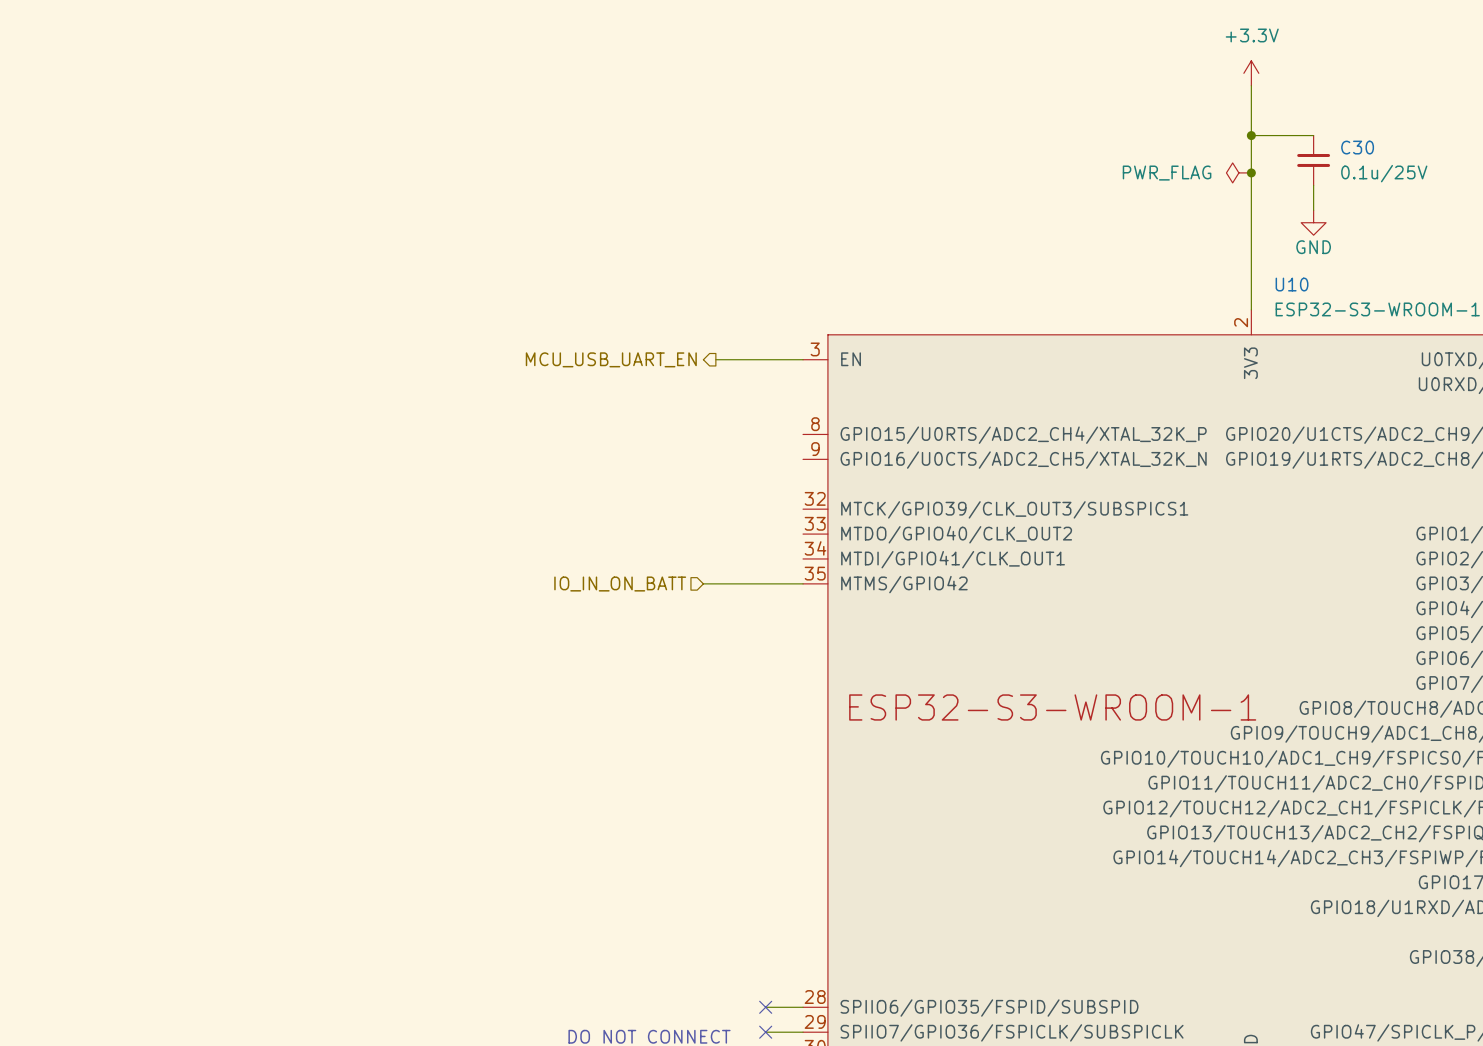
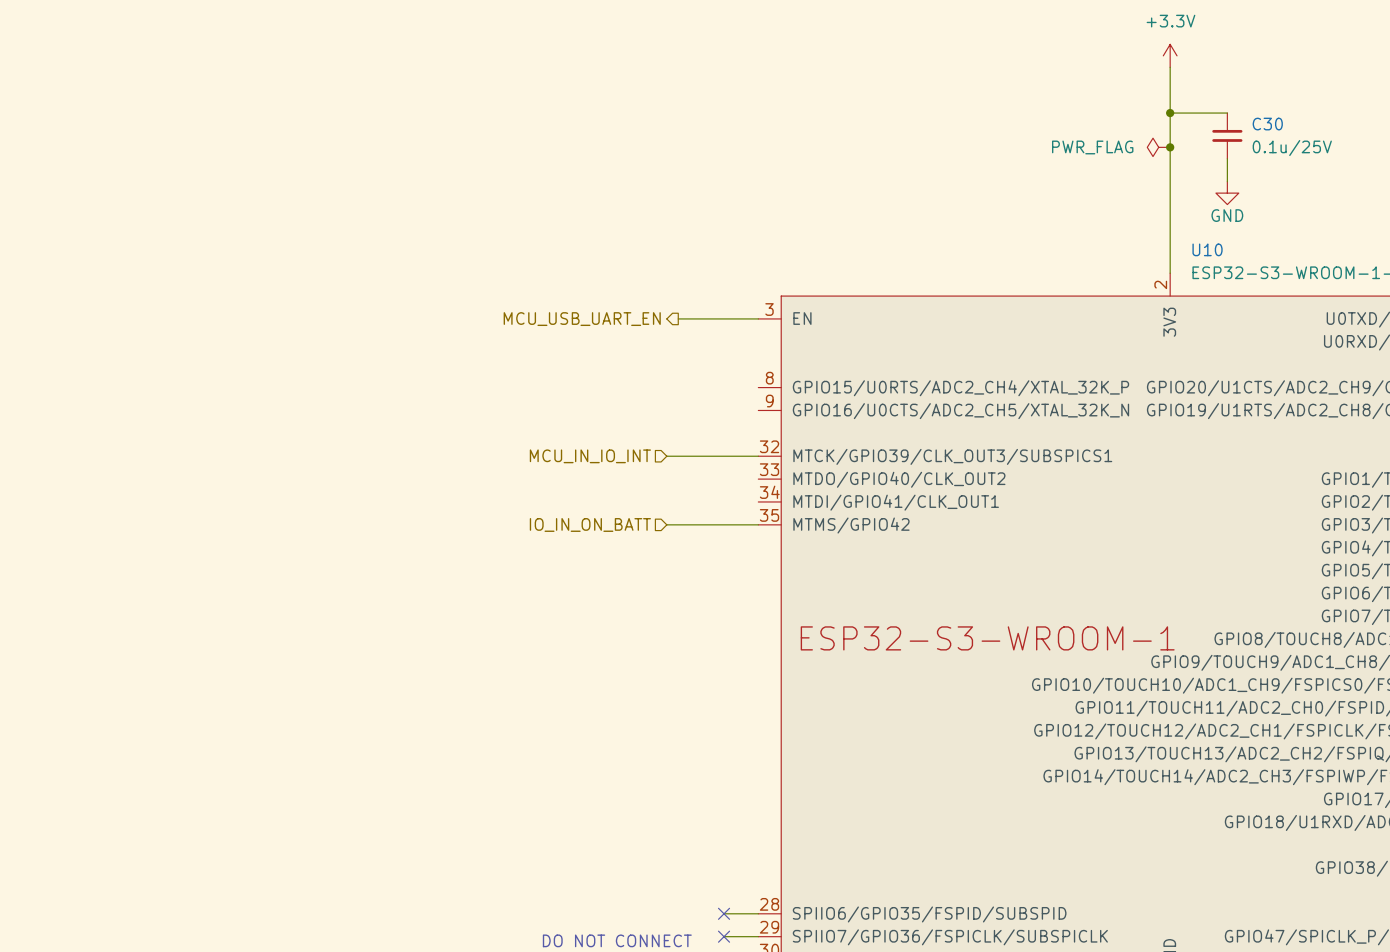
hierarchical label: none -> MCU_IN_IO_INT (590, 456)
wire: none -> (666, 456) (758, 456)

